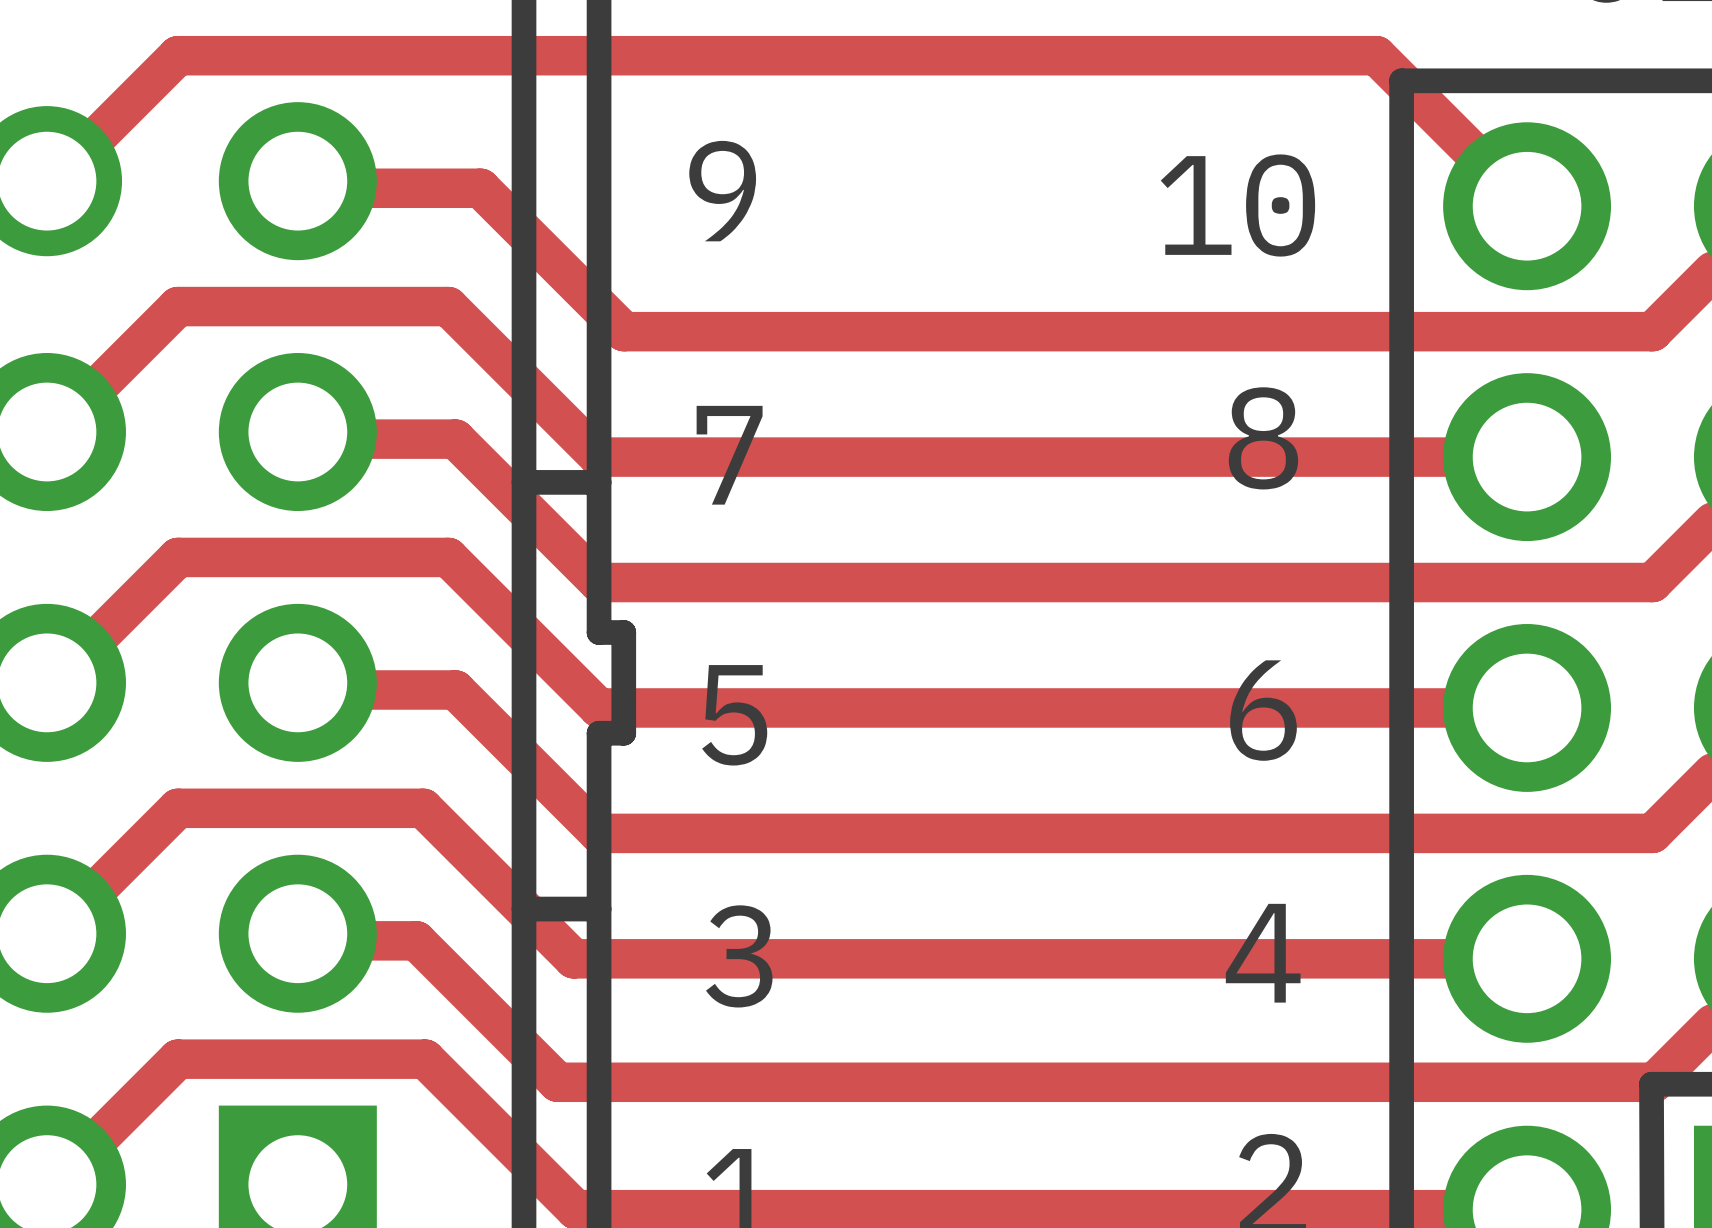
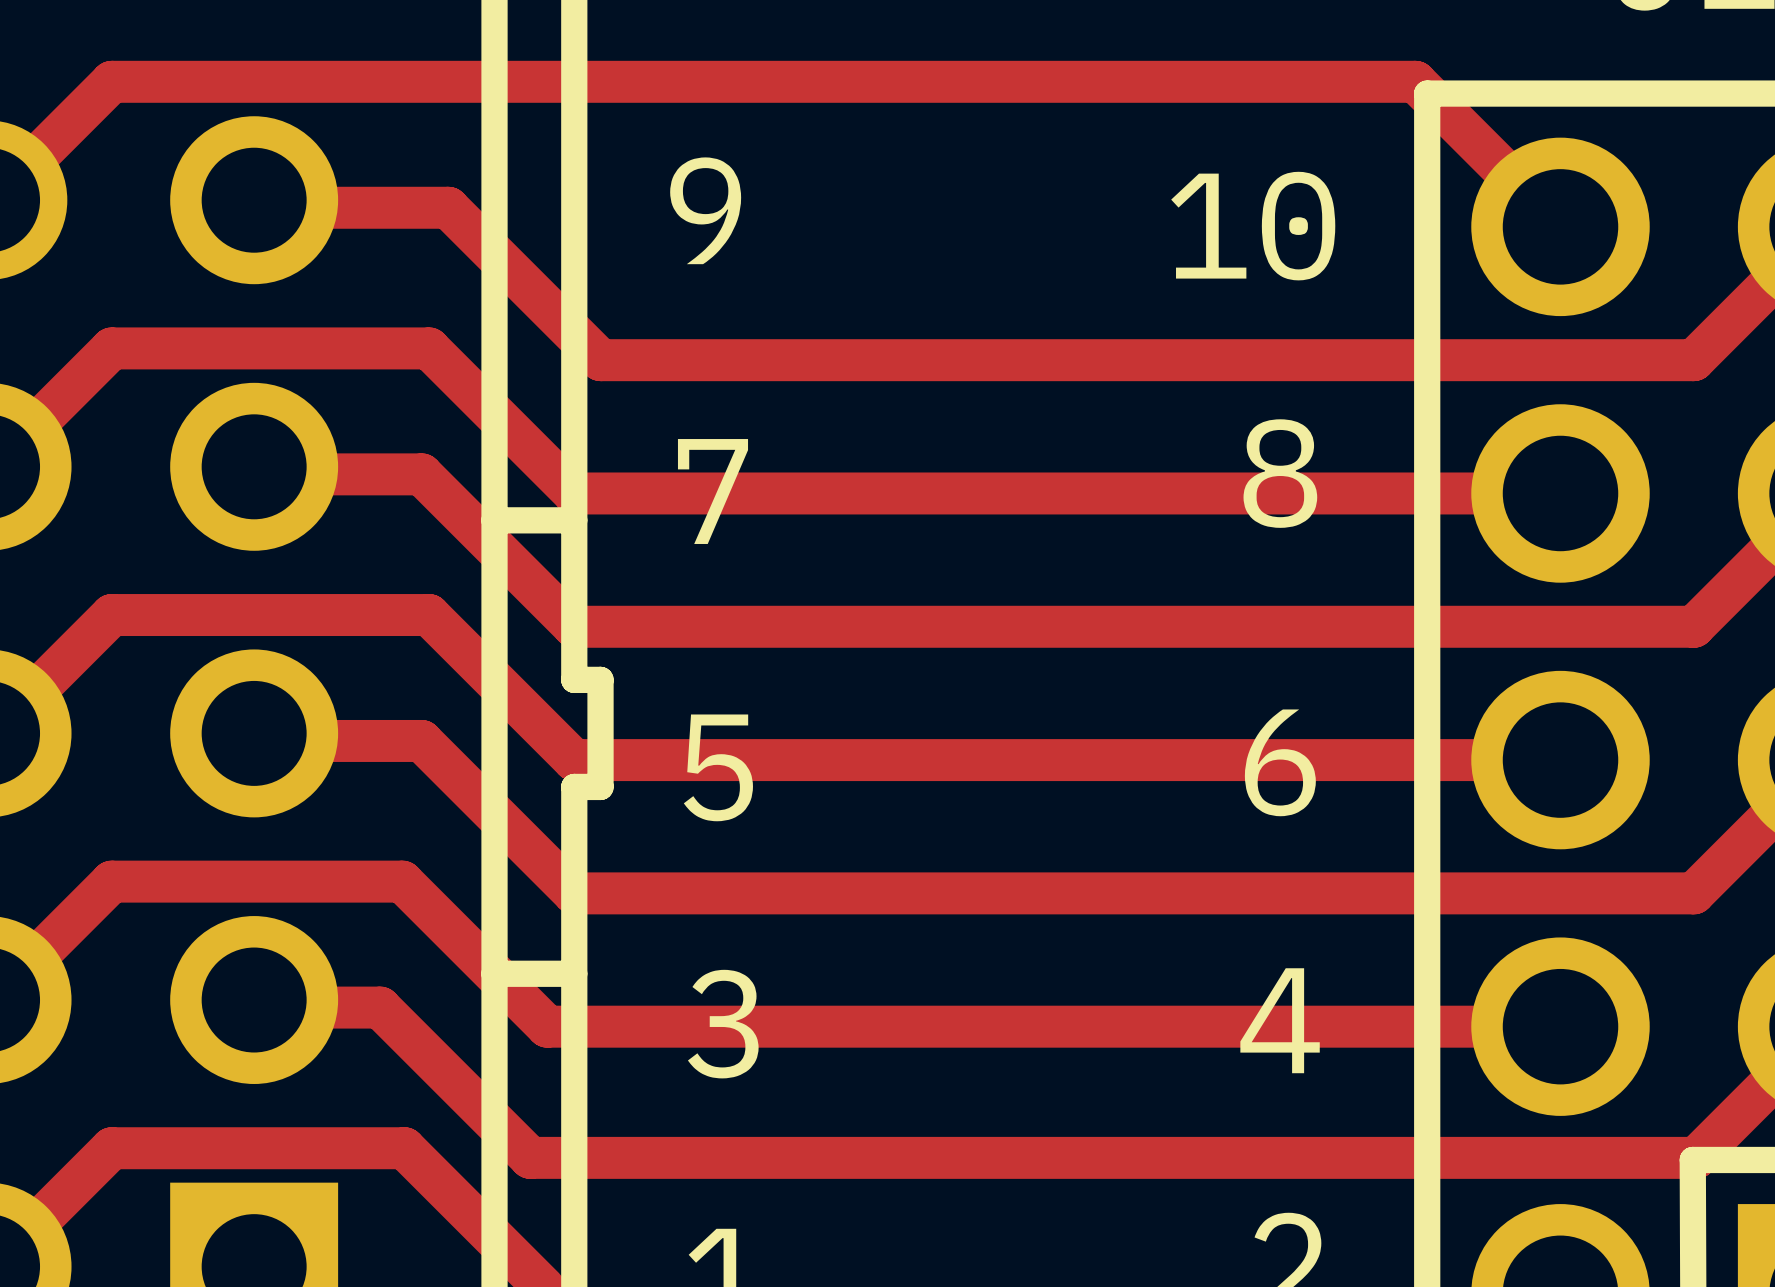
track: (163, 69) (177, 55) (1376, 55) (1390, 69) -> (111, 81) (1415, 81)
track: (163, 320) (177, 306) (448, 306) (462, 320) -> (111, 348) (429, 348)
track: (163, 571) (177, 557) (448, 557) (462, 571) -> (111, 615) (429, 615)
track: (163, 822) (177, 808) (423, 808) (437, 822) -> (111, 881) (402, 881)
track: (163, 1073) (177, 1059) (425, 1059) (439, 1073) -> (111, 1148) (404, 1148)

